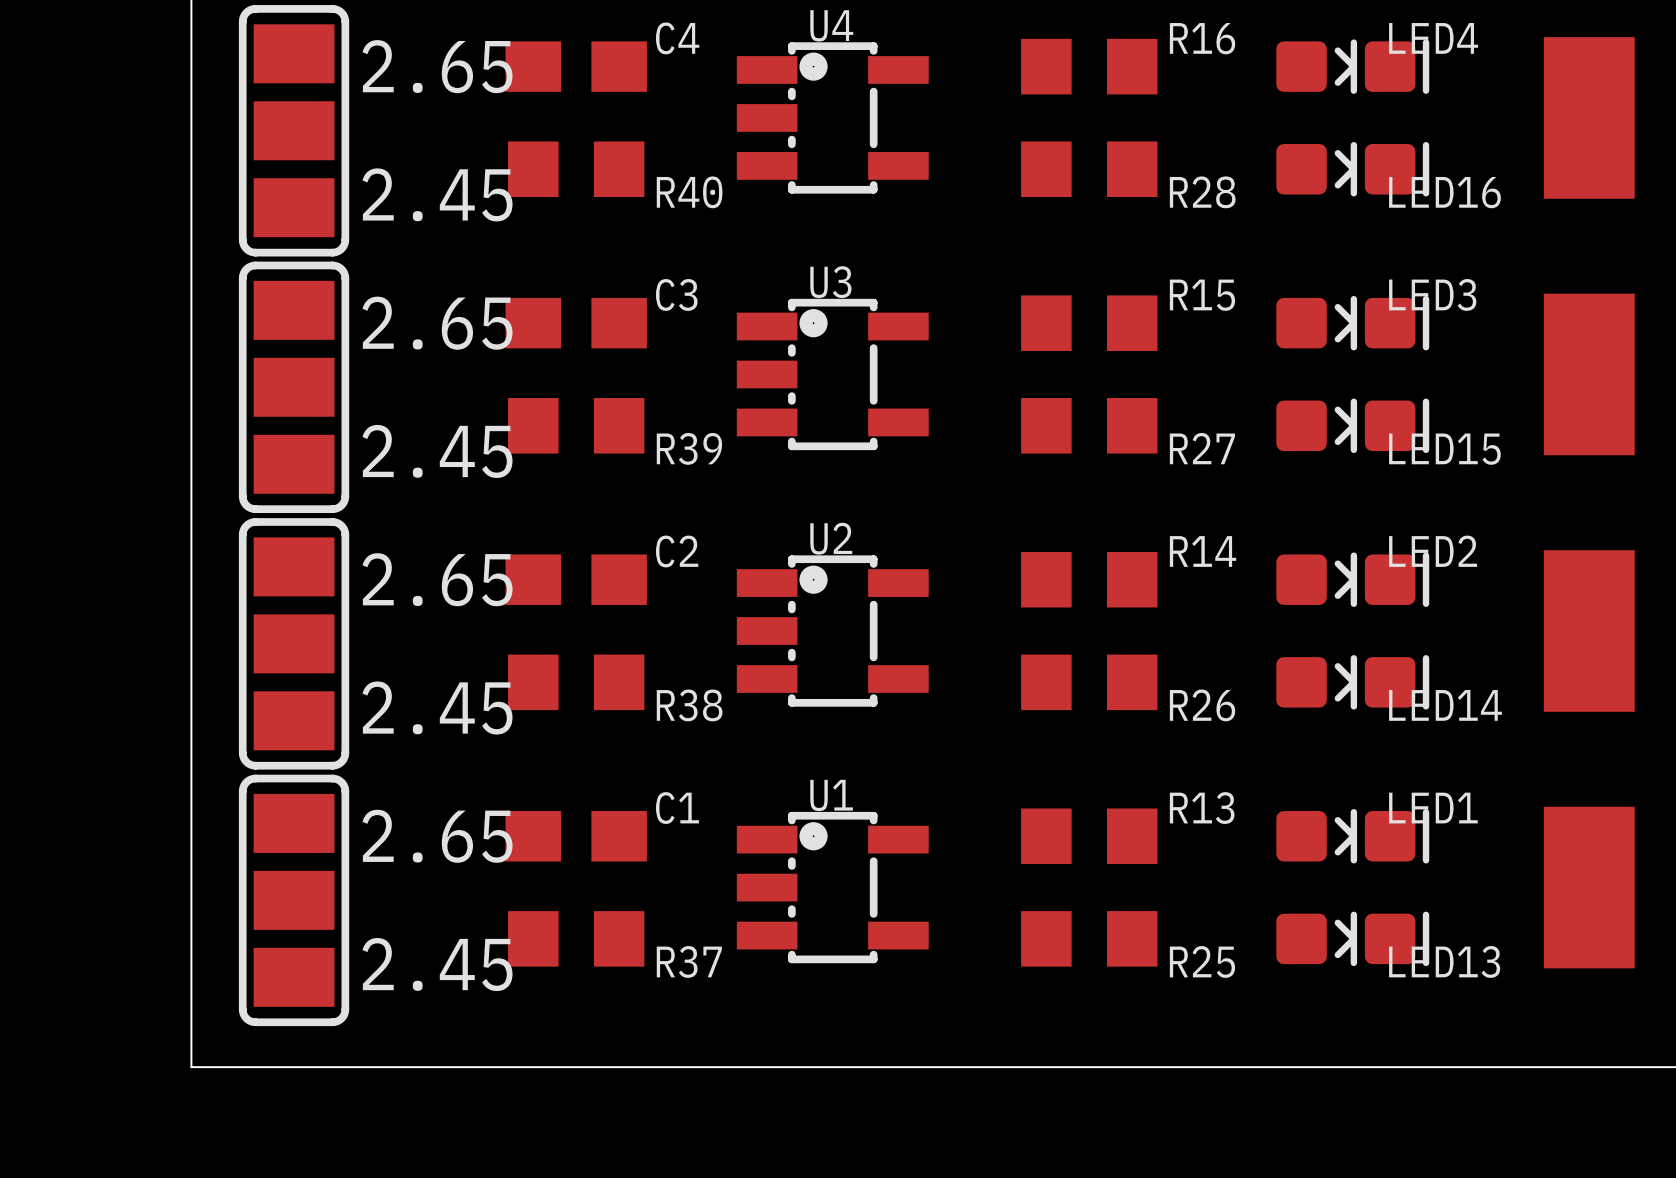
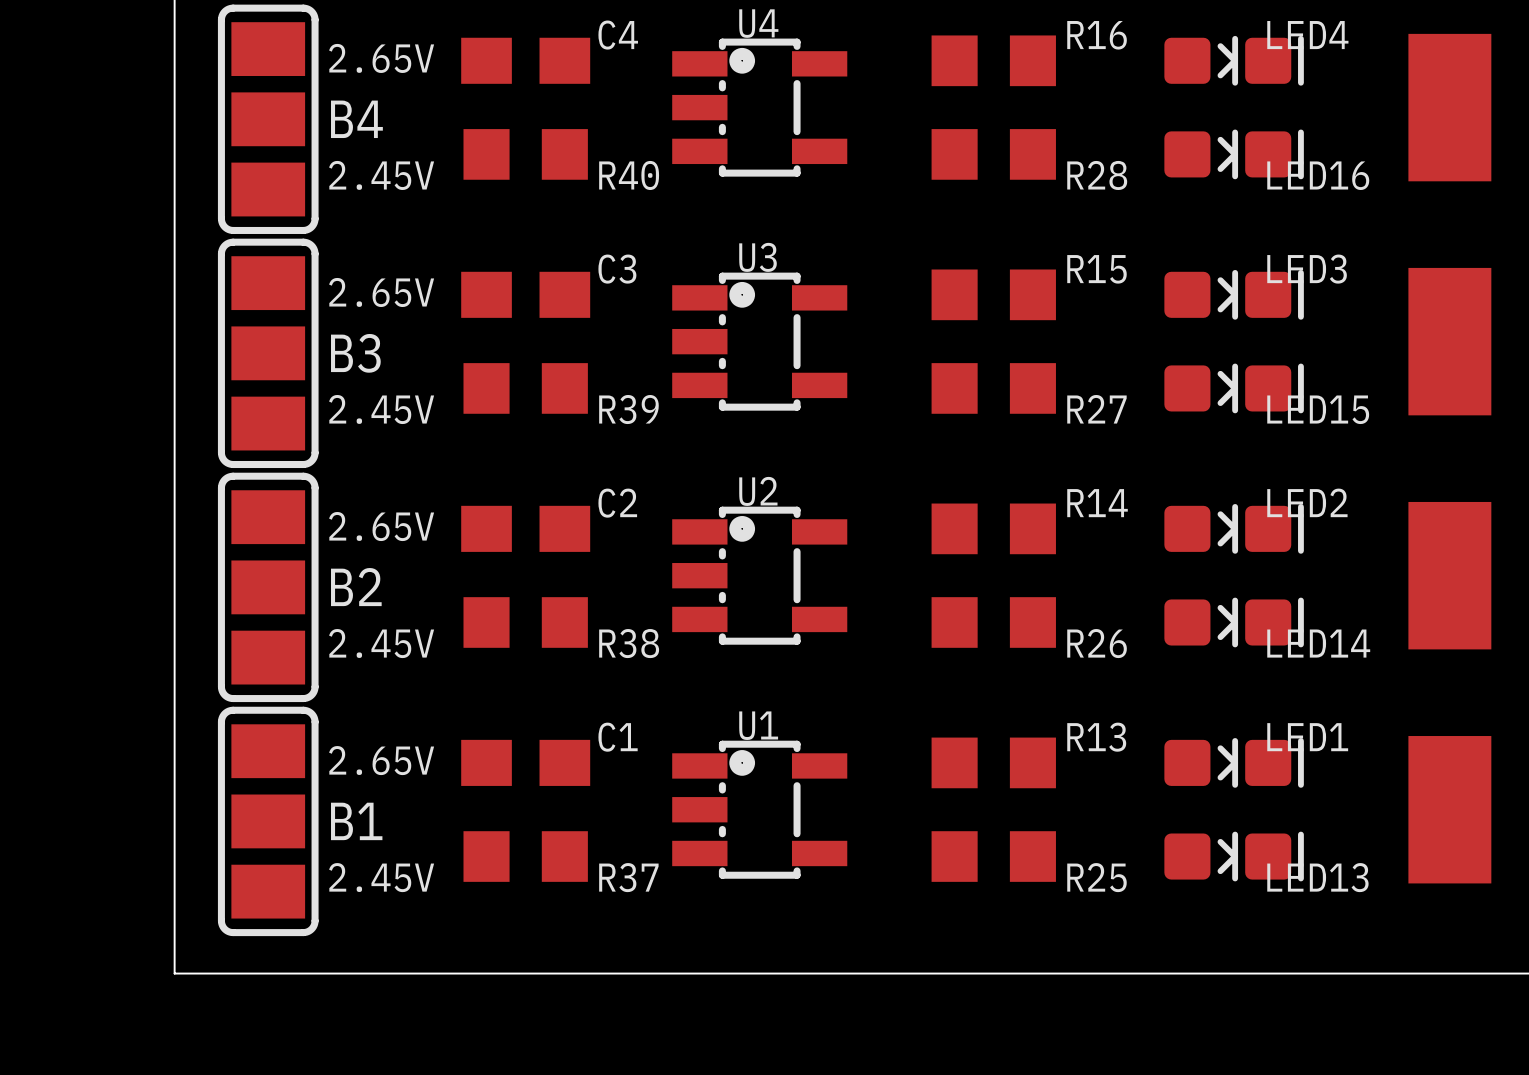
text: 2.65 (437, 66) -> 2.65V (381, 58)
text: none -> B4 (356, 119)
text: 2.45 (437, 194) -> 2.45V (381, 175)
text: 2.65 (437, 323) -> 2.65V (381, 292)
text: none -> B3 (355, 353)
text: 2.45 (437, 451) -> 2.45V (381, 409)
text: 2.65 (437, 579) -> 2.65V (381, 526)
text: none -> B2 (356, 587)
text: 2.45 (437, 707) -> 2.45V (381, 643)
text: 2.65 (437, 836) -> 2.65V (381, 760)
text: none -> B1 (356, 821)
text: 2.45 (437, 964) -> 2.45V (381, 877)

